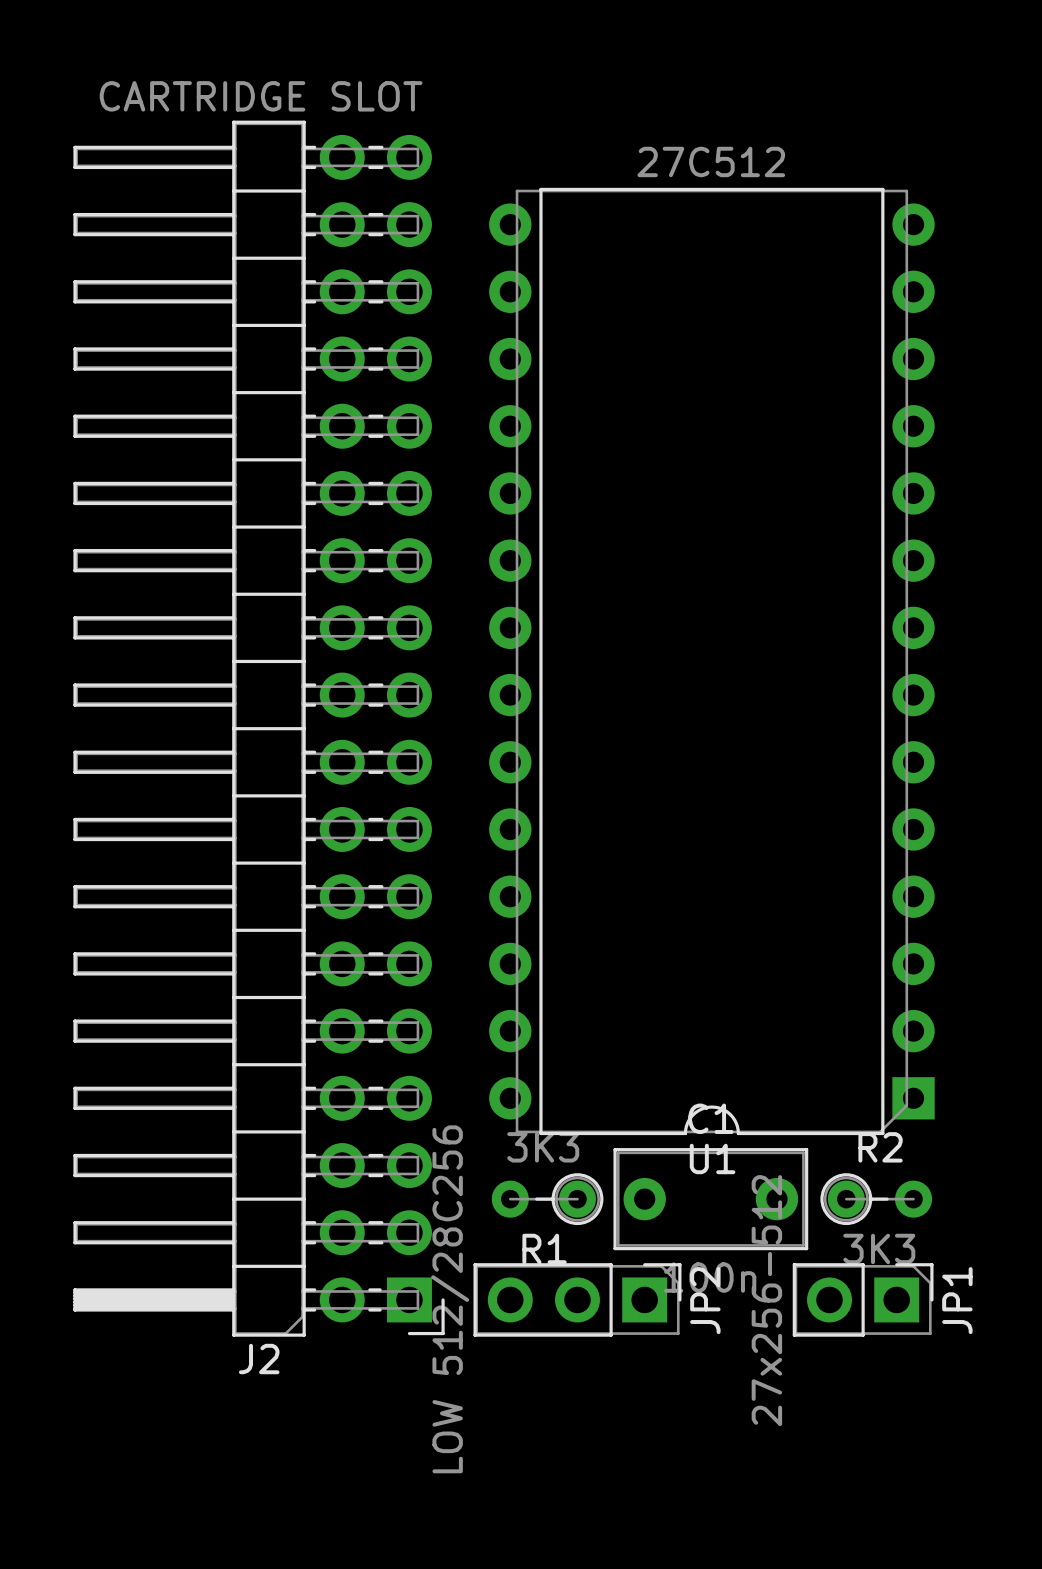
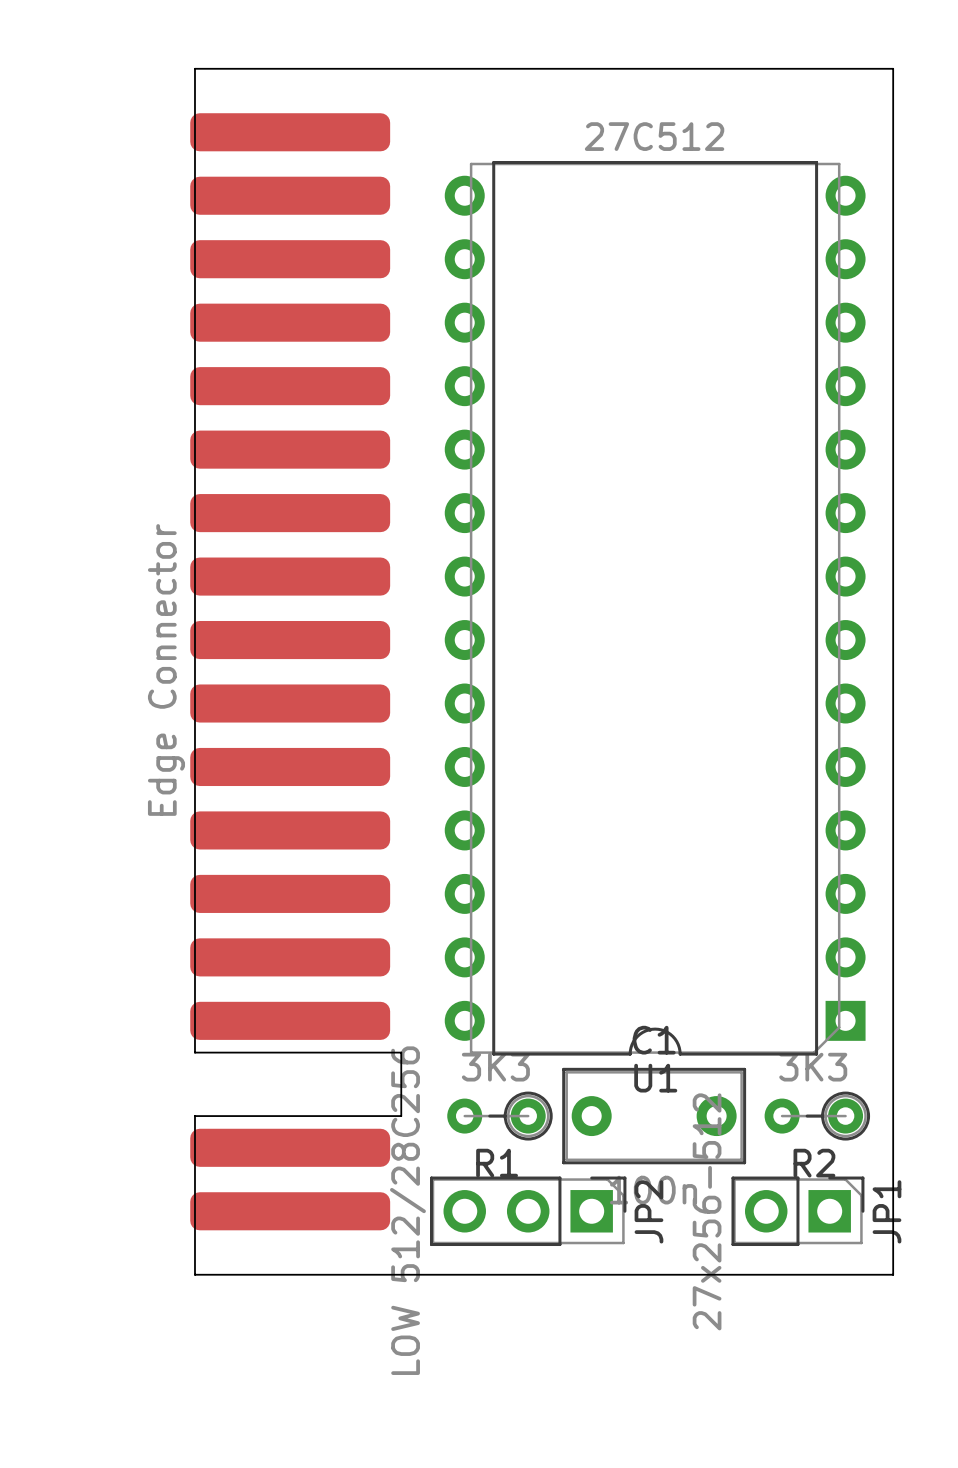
board edge: none -> (194, 68) (194, 1052) (401, 1052) (401, 1116) (194, 1116) (194, 1274) (893, 1274) (893, 68) (194, 68)
J2: CARTRIDGE SLOT (259, 728) -> none
part: none -> Edge Connector (290, 671)
R2 rotation: 0° (876, 1199) -> 180° (817, 1116)

